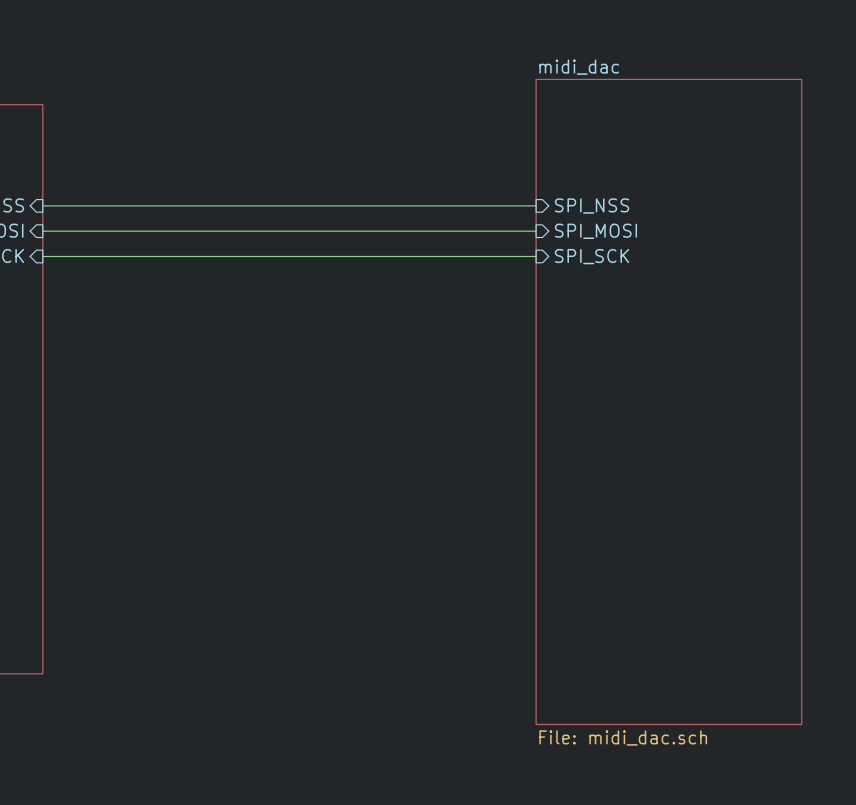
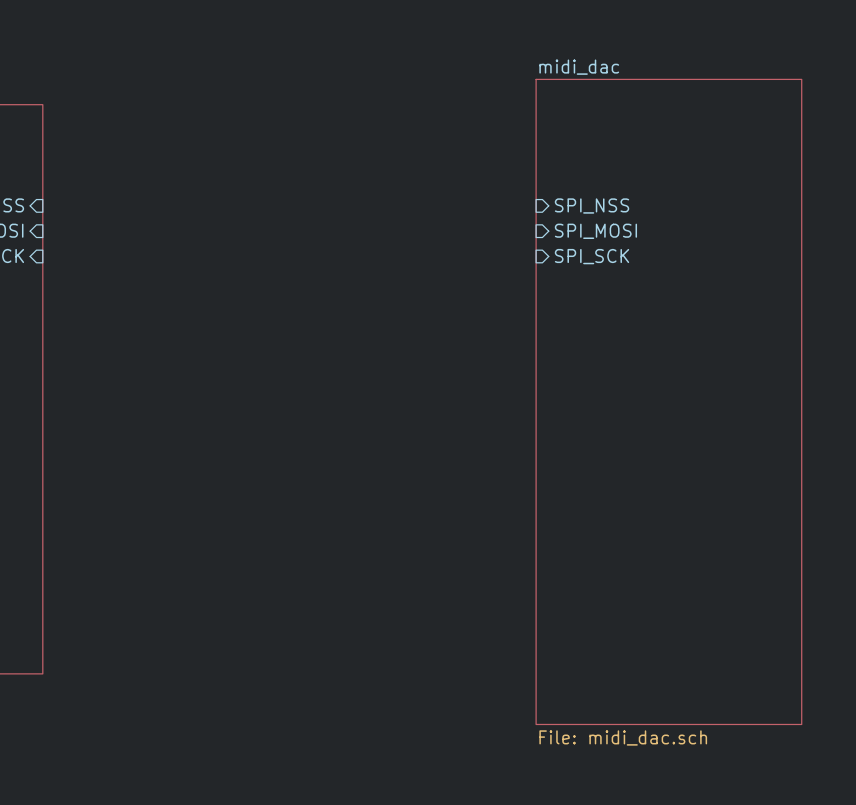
wire: (42, 205) (536, 205) -> none
wire: (42, 231) (536, 231) -> none
wire: (42, 256) (536, 256) -> none

